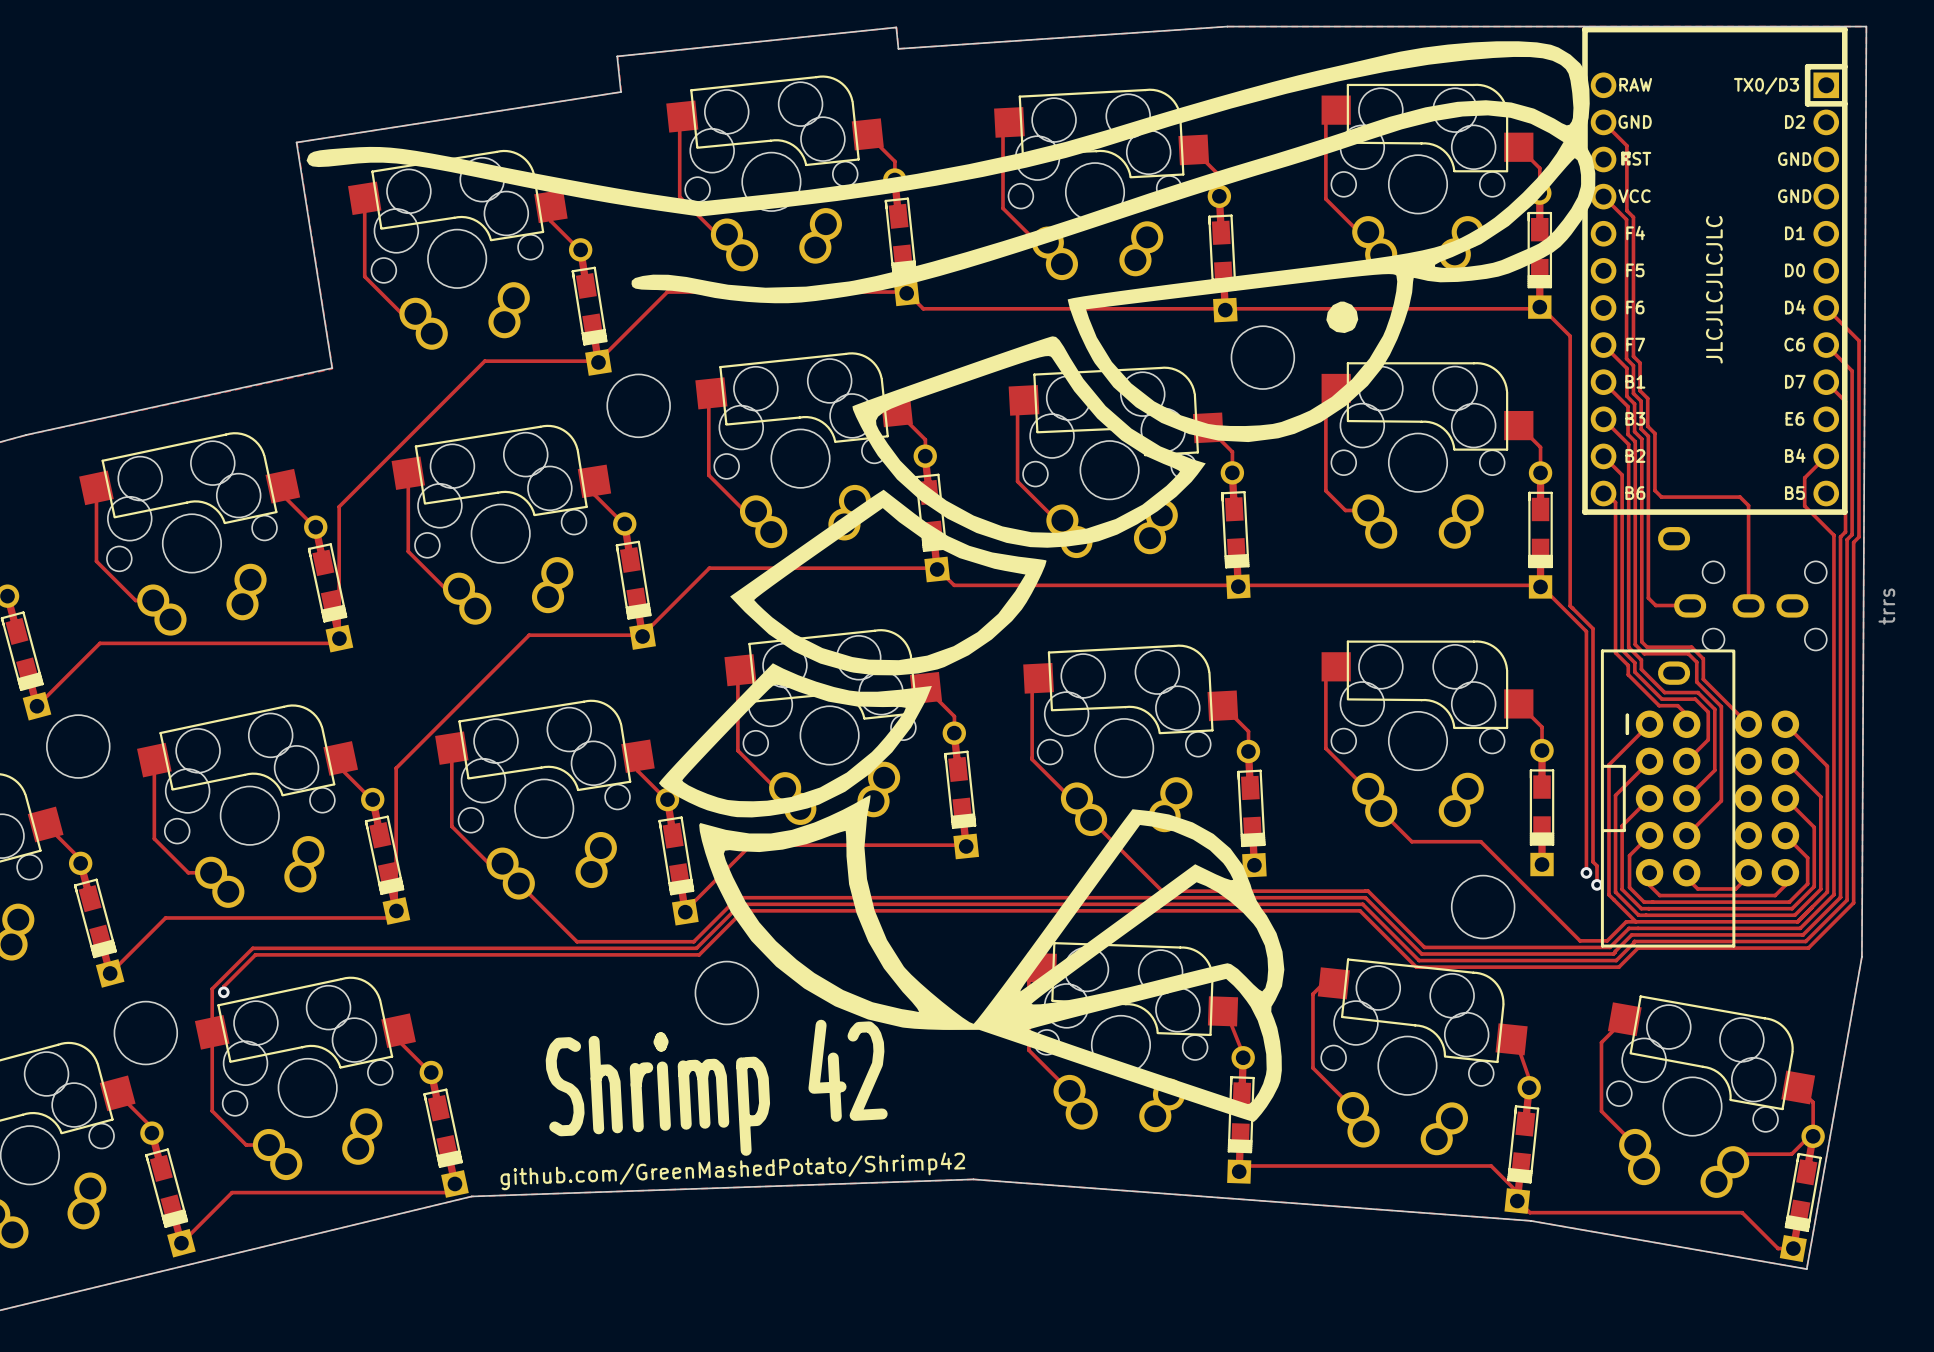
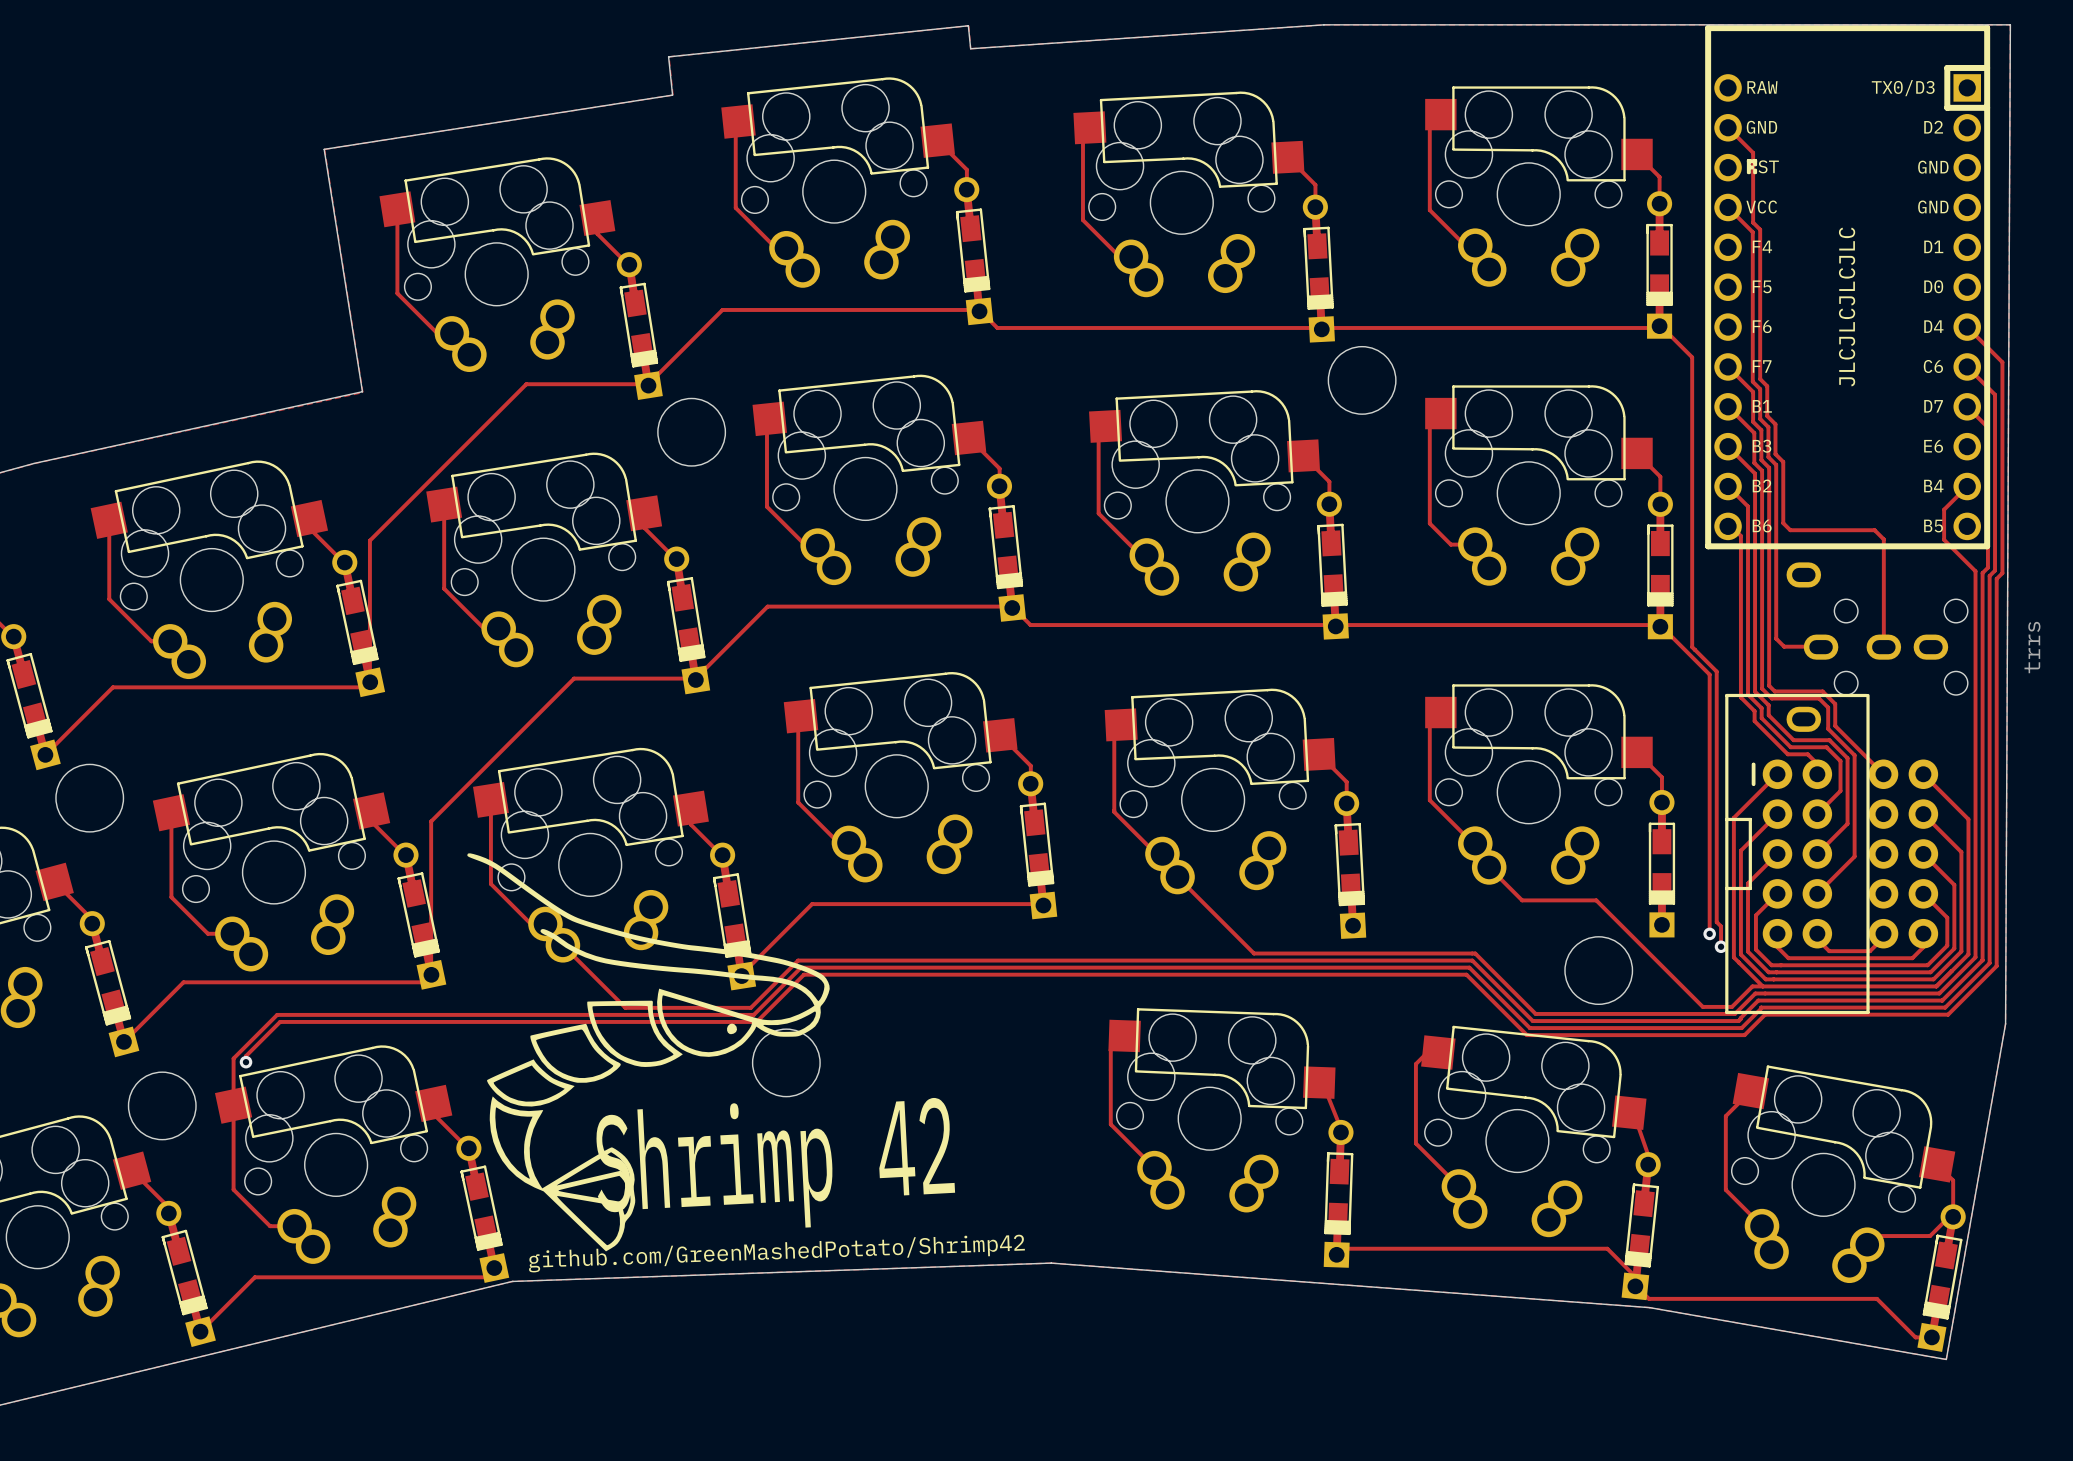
drawing: [306, 41, 1596, 1122] -> none
drawing: none -> [467, 853, 830, 1252]
text position: github.com/GreenMashedPotato/Shrimp42 (732, 1171) -> github.com/GreenMashedPotato/Shrimp42 (776, 1253)

